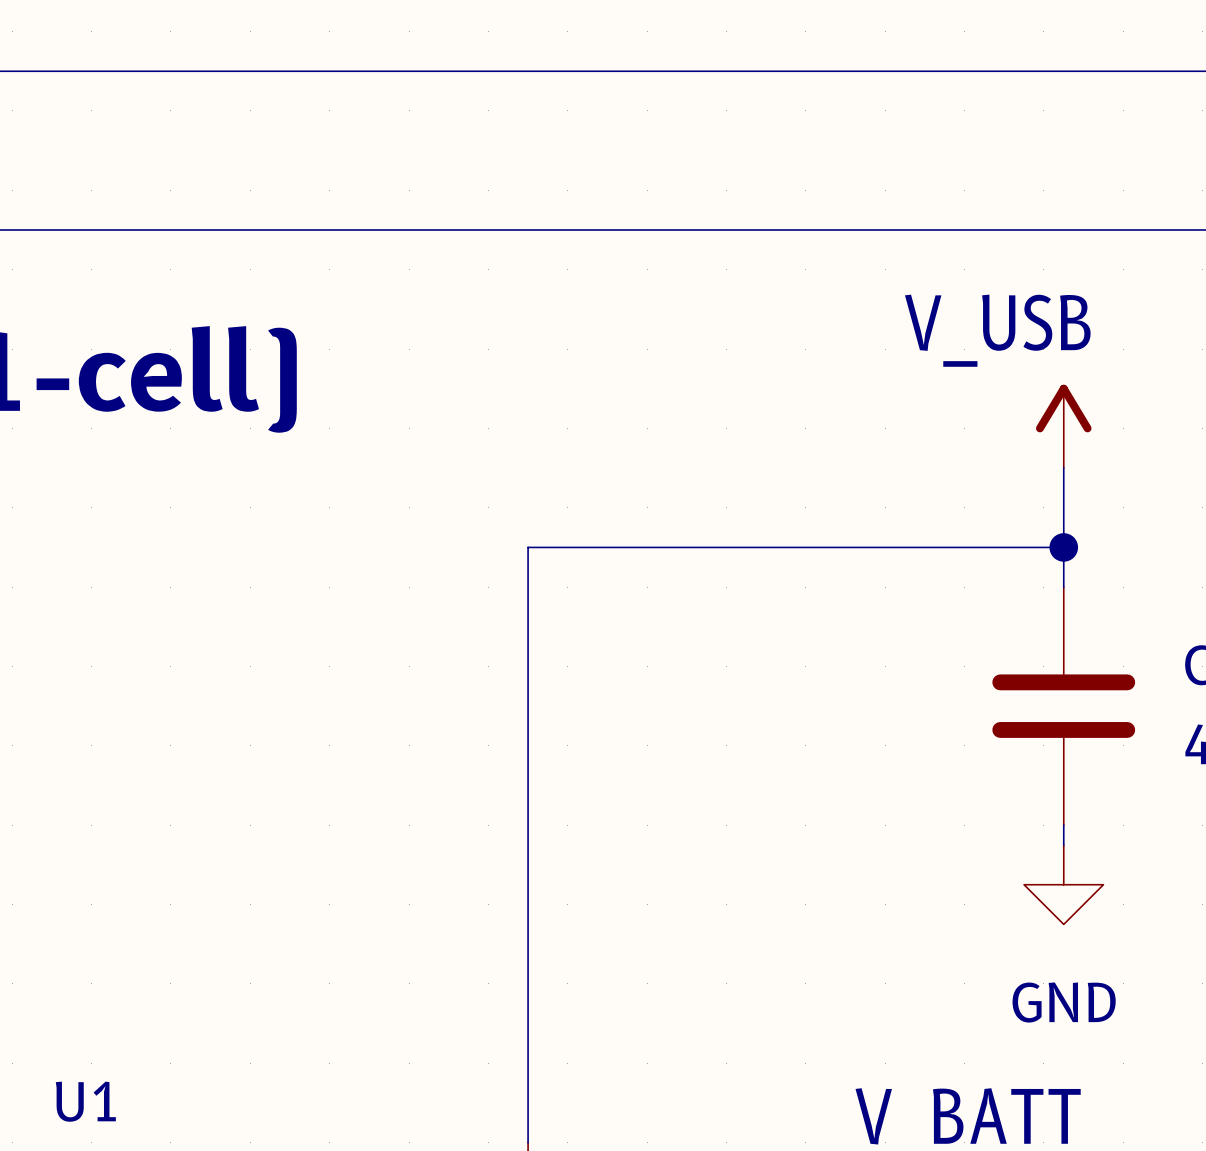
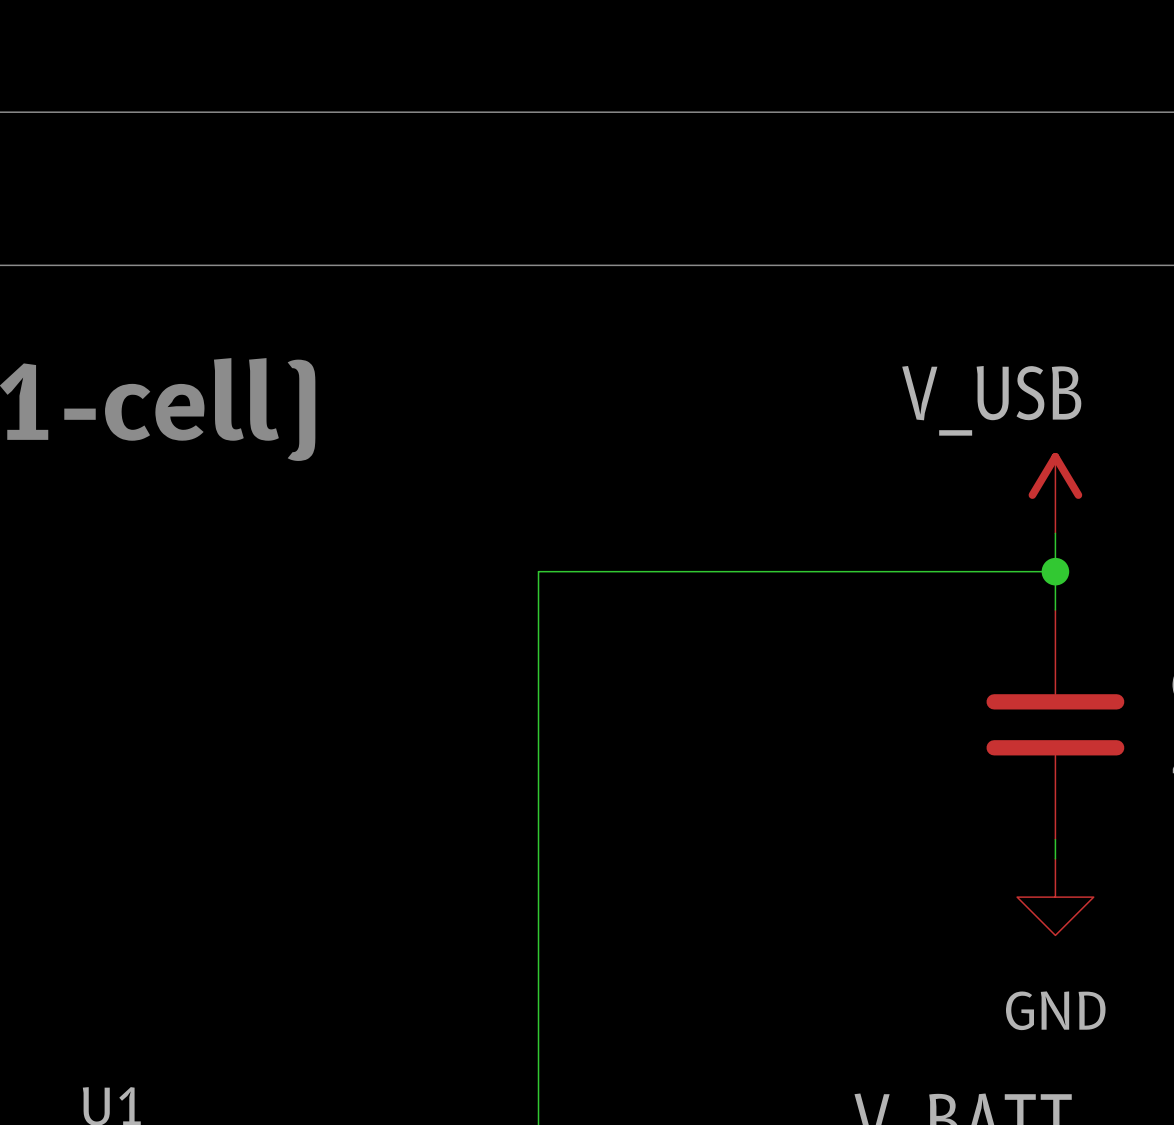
power symbol position: V_USB (1063, 426) -> V_USB (1055, 493)

